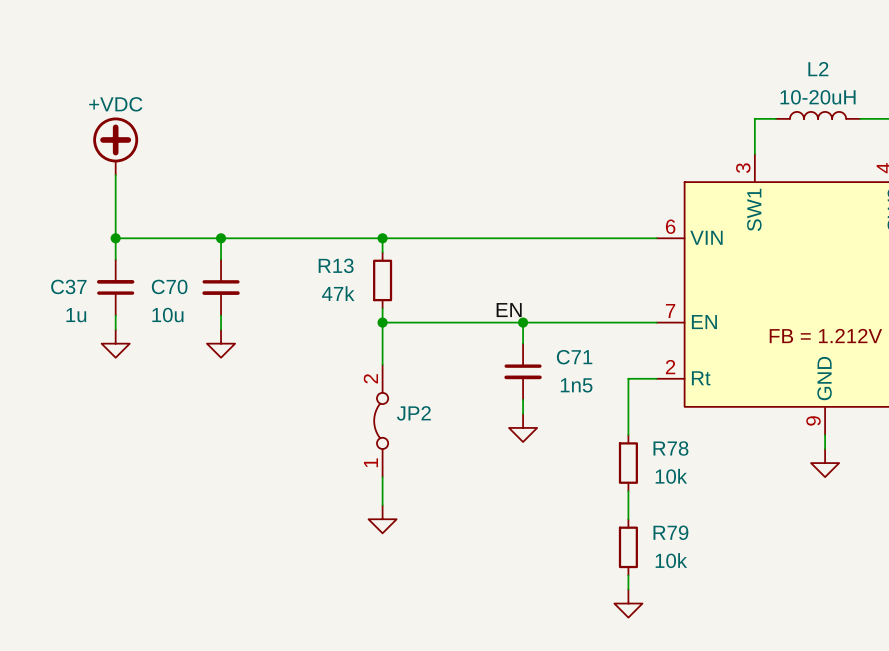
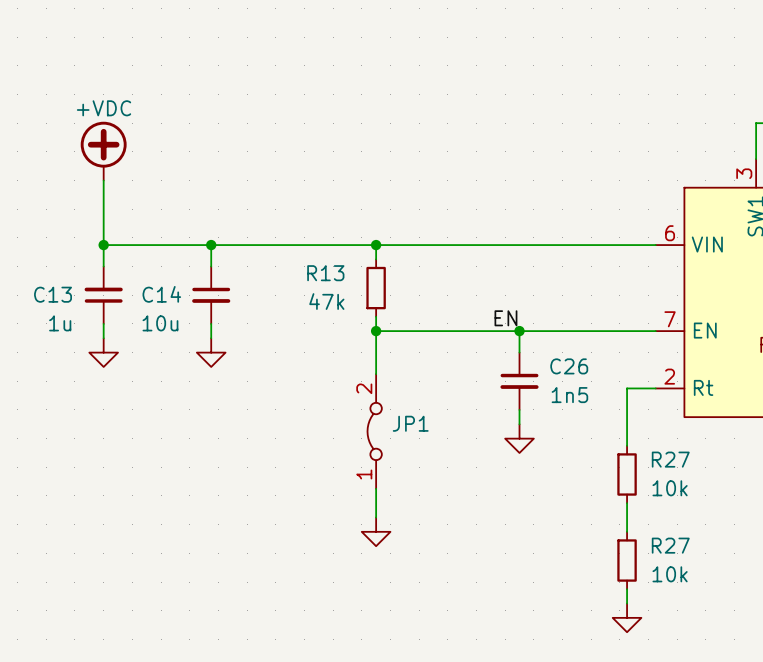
C37 name: C37 (68, 286) -> C13 (53, 294)
C70 name: C70 (169, 286) -> C14 (161, 294)
C71 name: C71 (574, 357) -> C26 (569, 366)
JP2 name: JP2 (413, 413) -> JP1 (410, 423)
R78 name: R78 (670, 448) -> R27 (670, 459)
R79 name: R79 (670, 532) -> R27 (670, 545)

